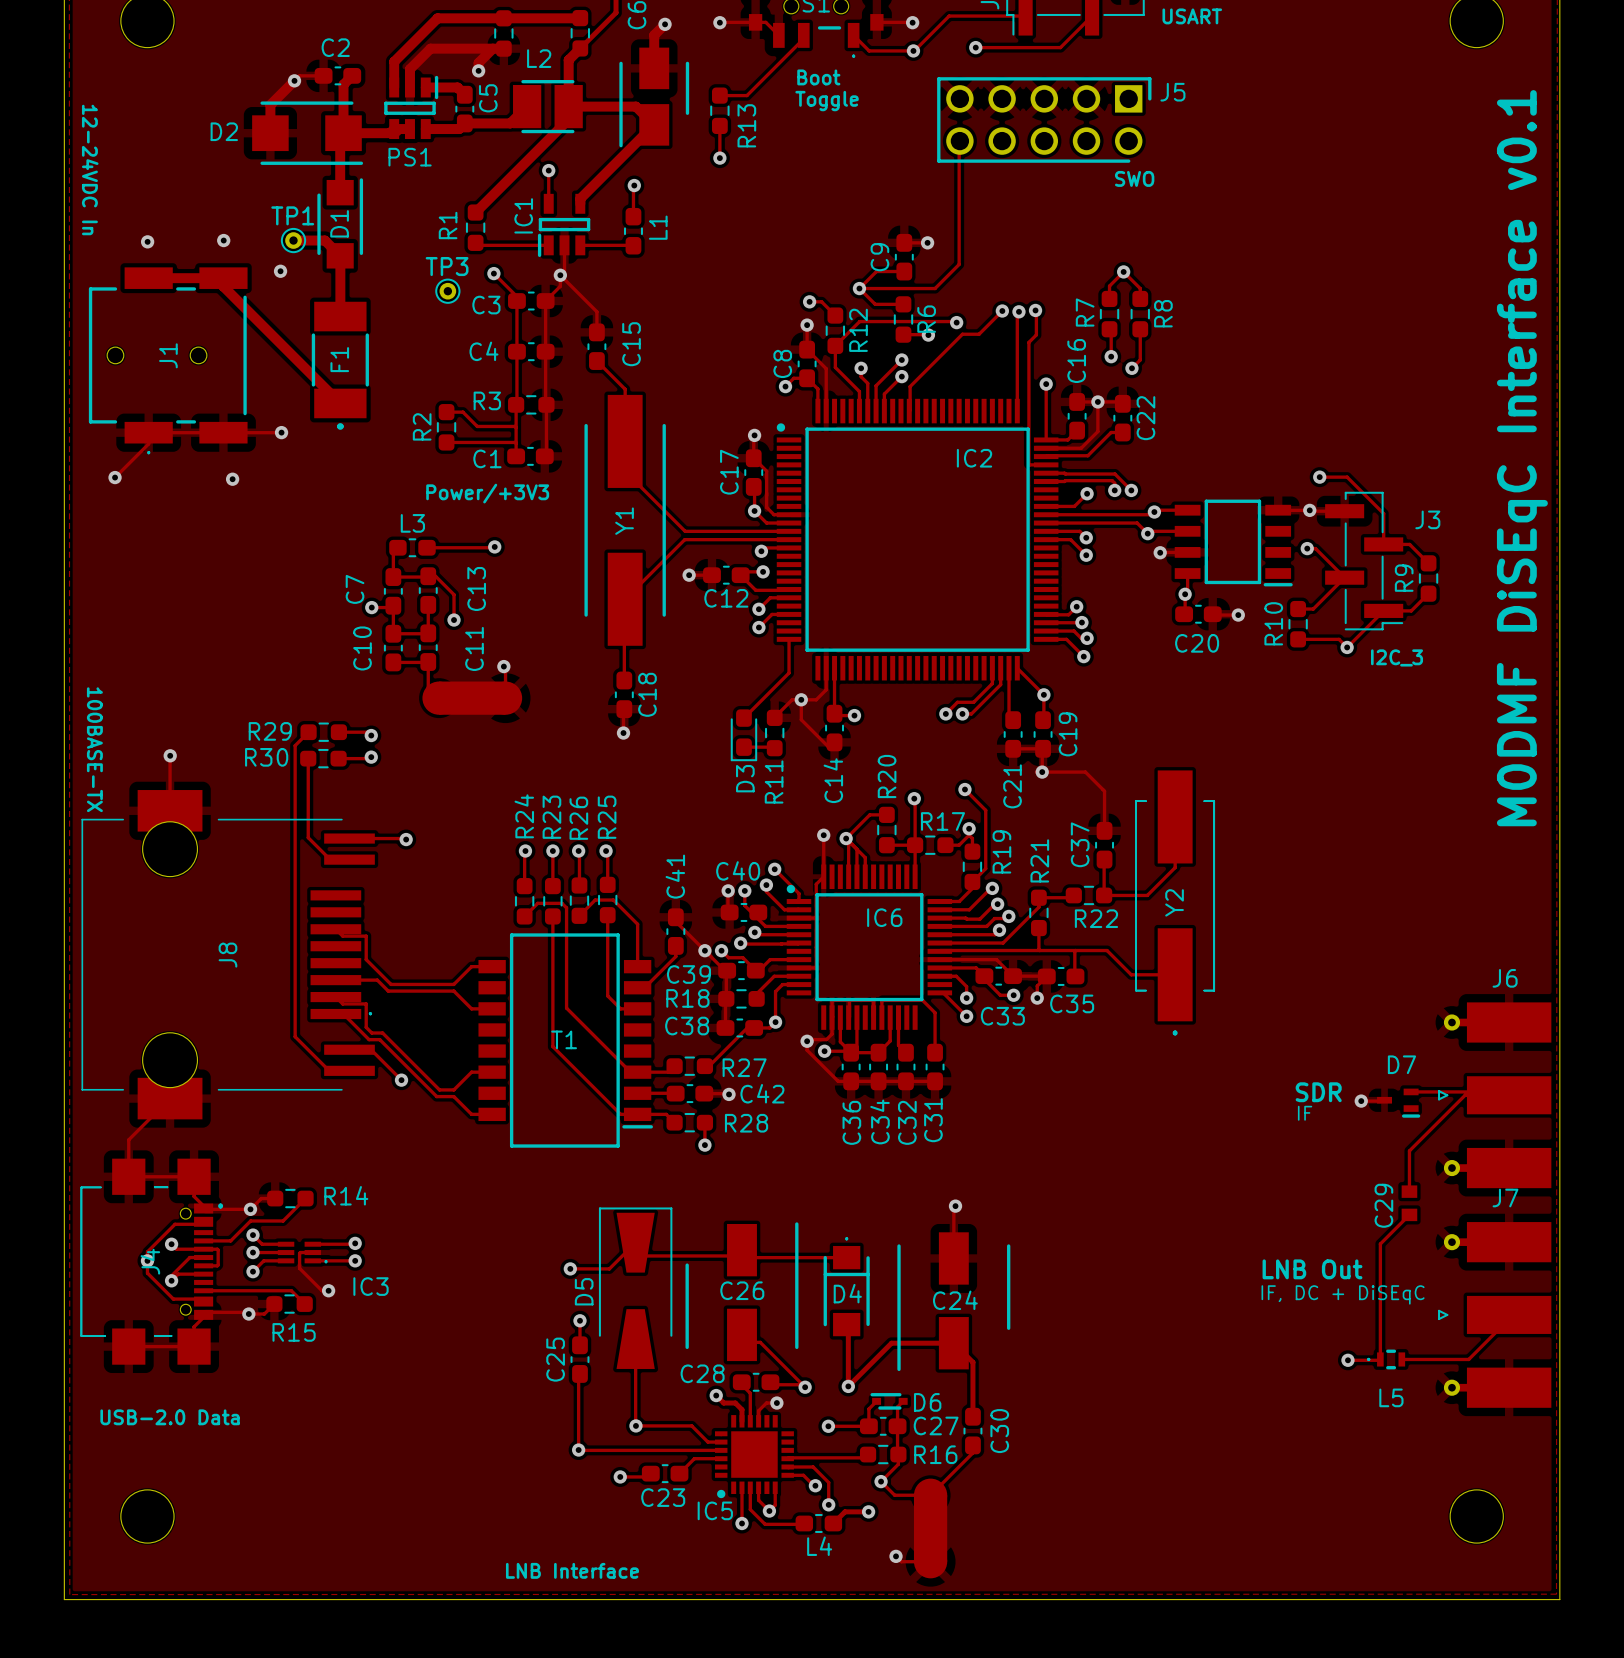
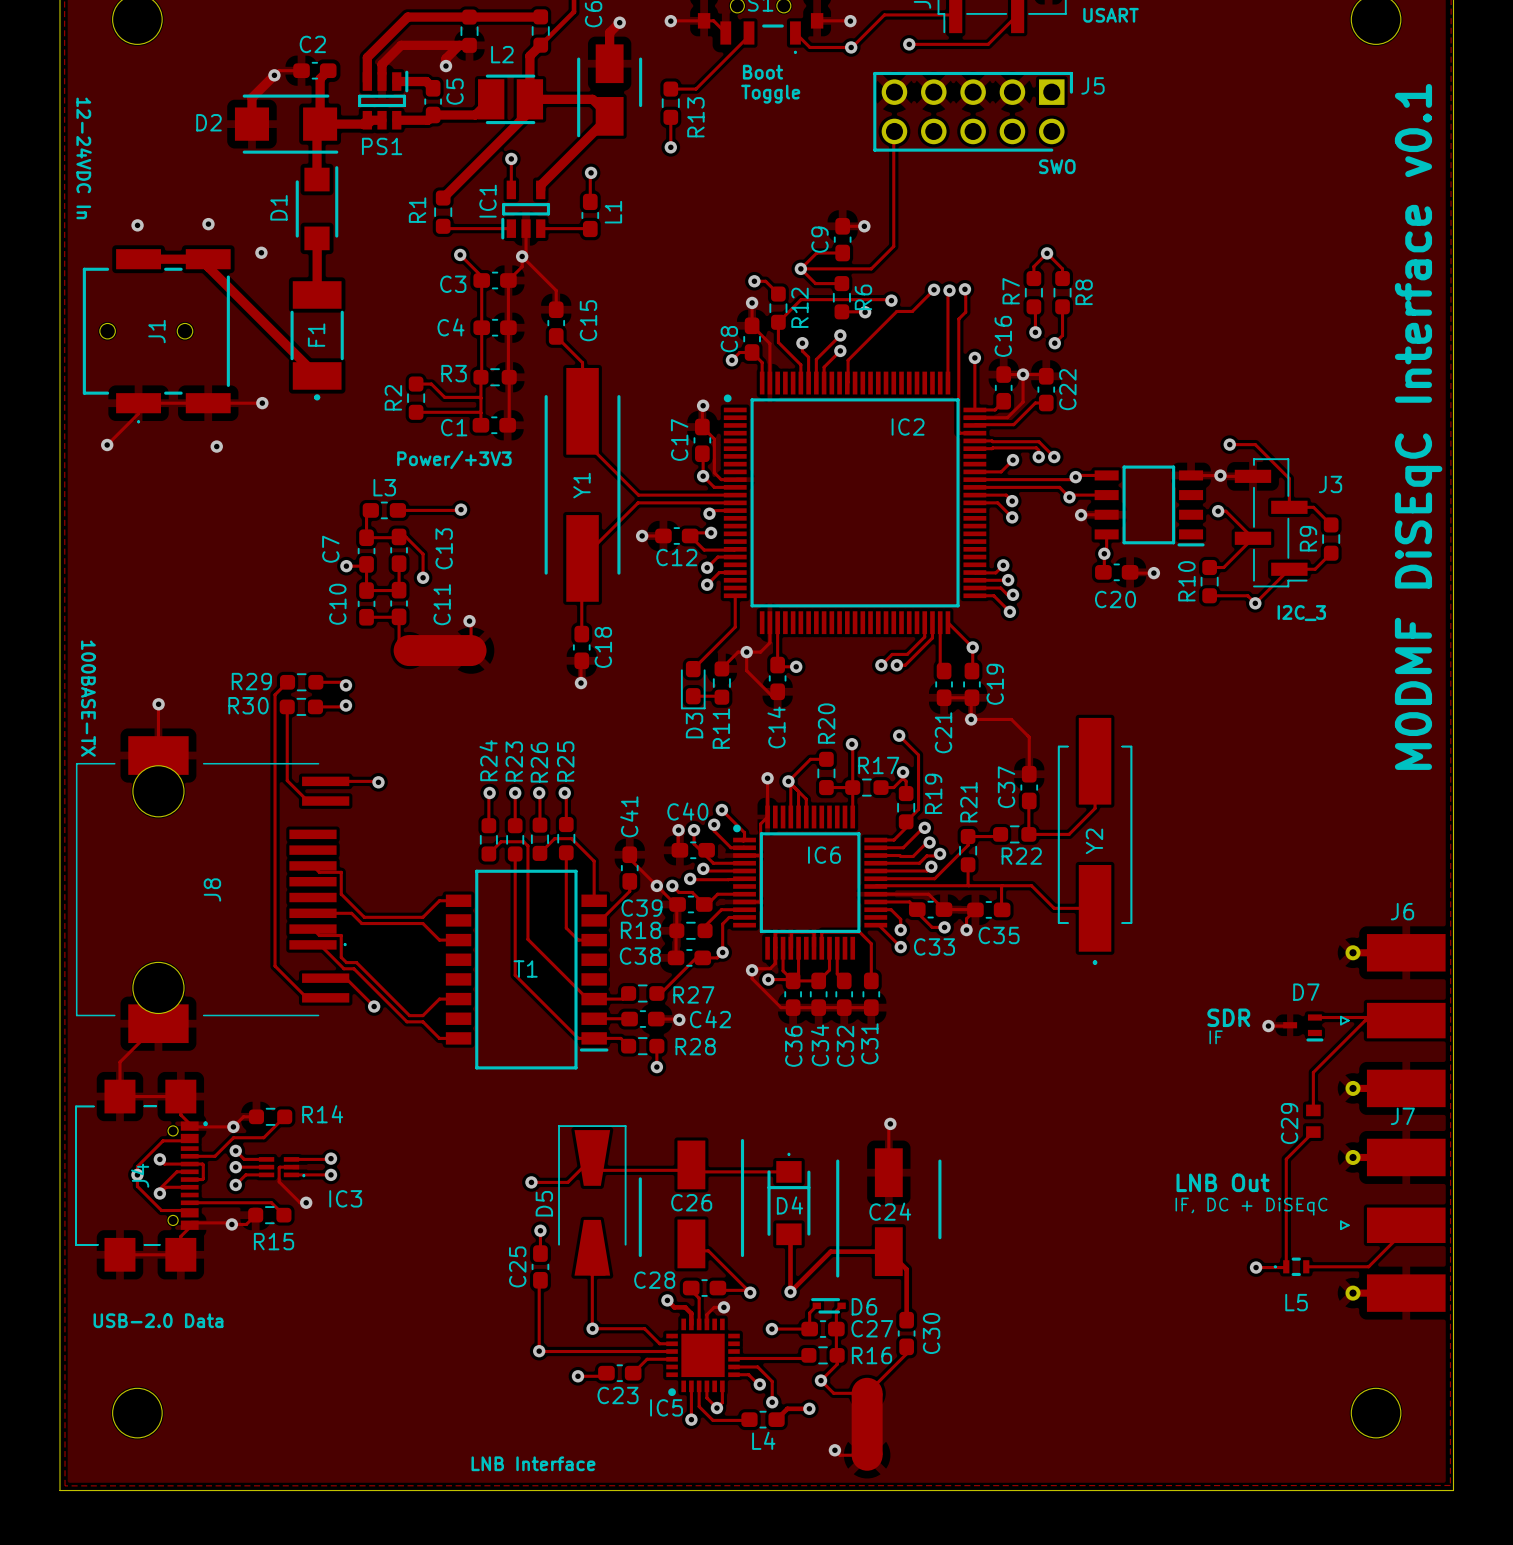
D1 name position: D1 (339, 223) -> D1 (278, 207)
track: (293, 240) (324, 240) (340, 255) -> none
TP1: (293, 240) -> none
TP3: (447, 291) -> none

